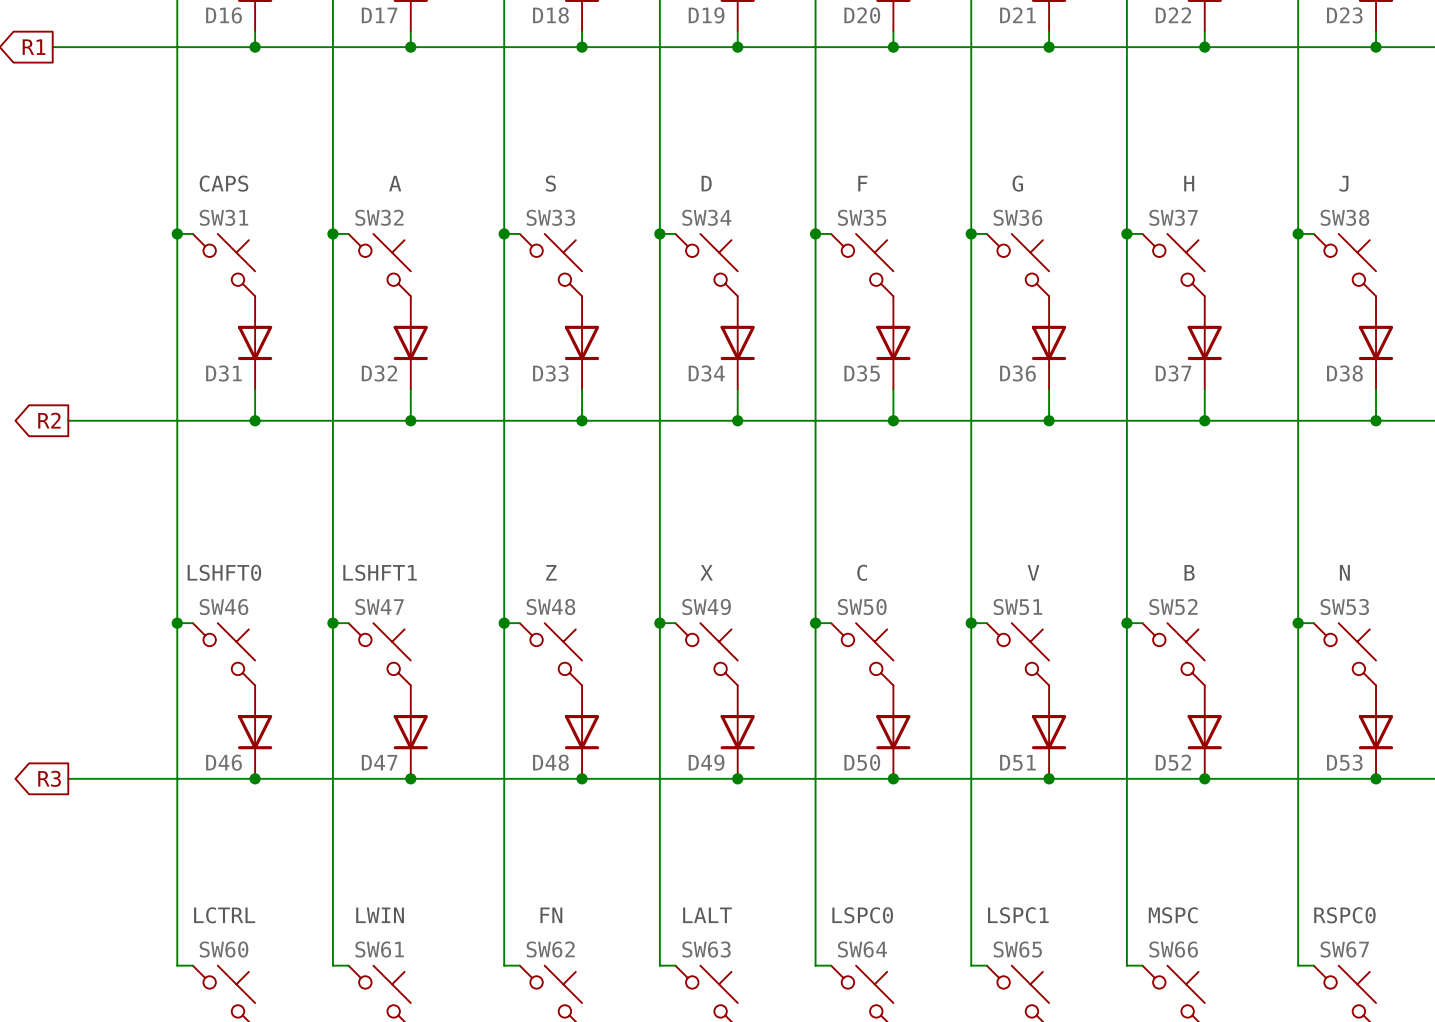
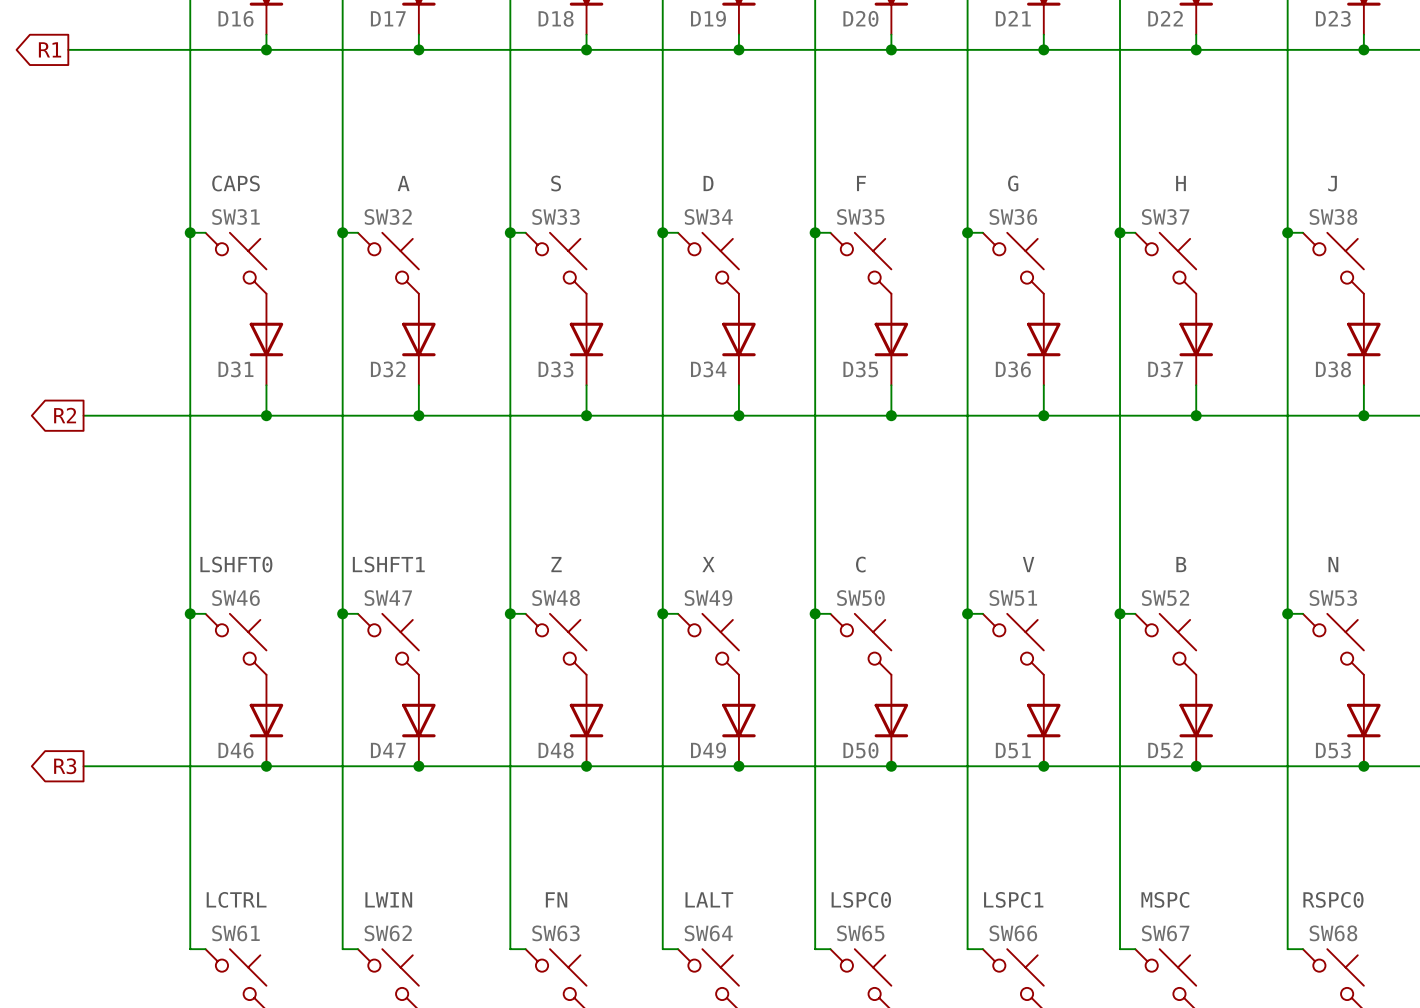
SW60 name: SW60 (224, 949) -> SW61 (235, 933)
SW61 name: SW61 (379, 949) -> SW62 (388, 933)
SW62 name: SW62 (550, 949) -> SW63 (555, 933)
SW63 name: SW63 (706, 949) -> SW64 (708, 933)
SW64 name: SW64 (862, 949) -> SW65 (860, 933)
SW65 name: SW65 (1017, 949) -> SW66 (1013, 933)
SW66 name: SW66 (1173, 949) -> SW67 (1165, 933)
SW67 name: SW67 (1344, 949) -> SW68 (1333, 933)

